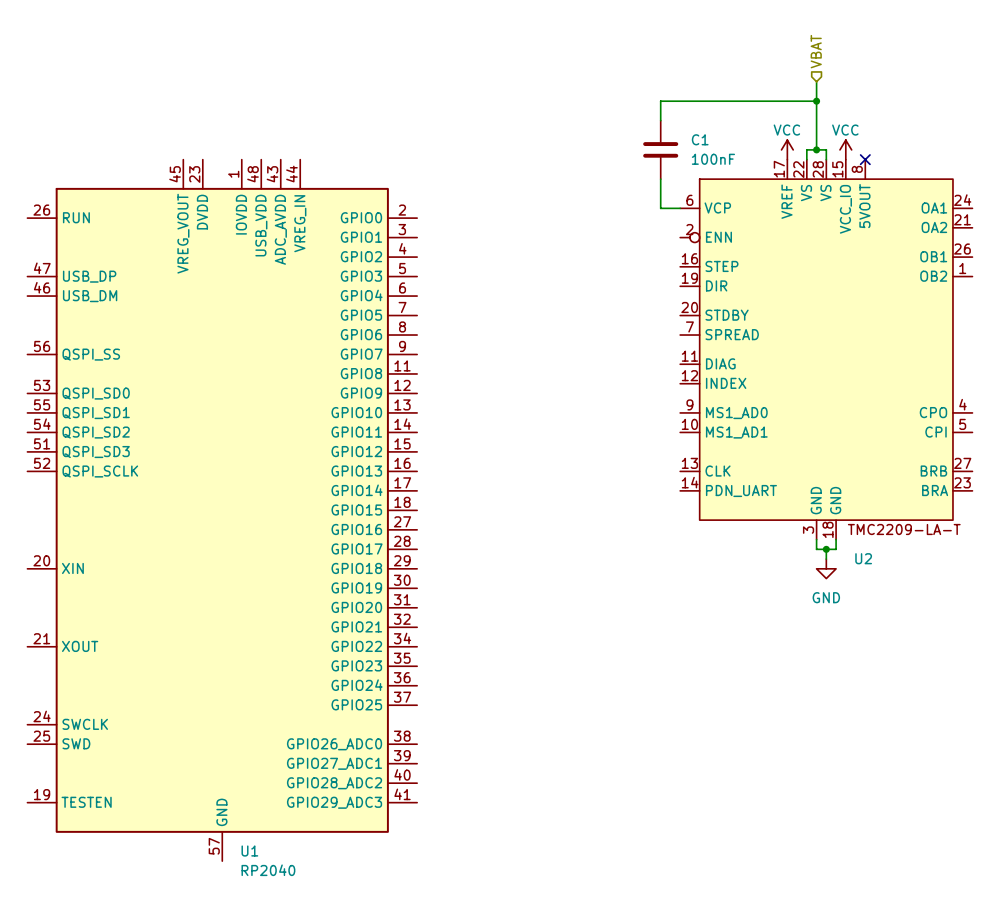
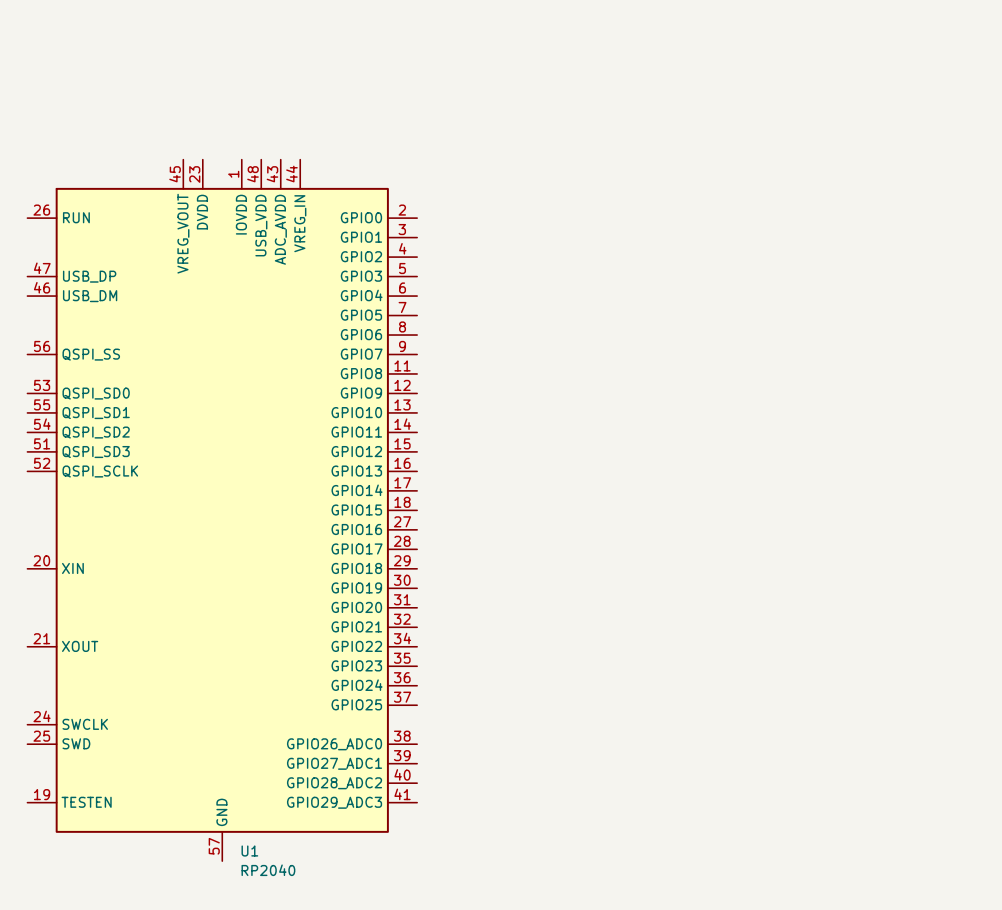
hierarchical label: VBAT (816, 51) -> none
wire: (816, 81) (816, 149) -> none
wire: (816, 101) (660, 101) (660, 120) -> none
junction: (816, 101) -> none
C1: 100nF (660, 149) -> none
power symbol: VCC (787, 149) -> none
junction: (816, 149) -> none
power symbol: VCC (845, 149) -> none
wire: (806, 159) (806, 149) (826, 149) (826, 159) -> none
no-connect mark: (865, 159) -> none
wire: (660, 179) (660, 208) (680, 208) -> none
U2: (826, 349) -> none
wire: (816, 539) (816, 549) (836, 549) (836, 539) -> none
wire: (826, 549) (826, 559) -> none
junction: (826, 549) -> none
power symbol: GND (826, 568) -> none

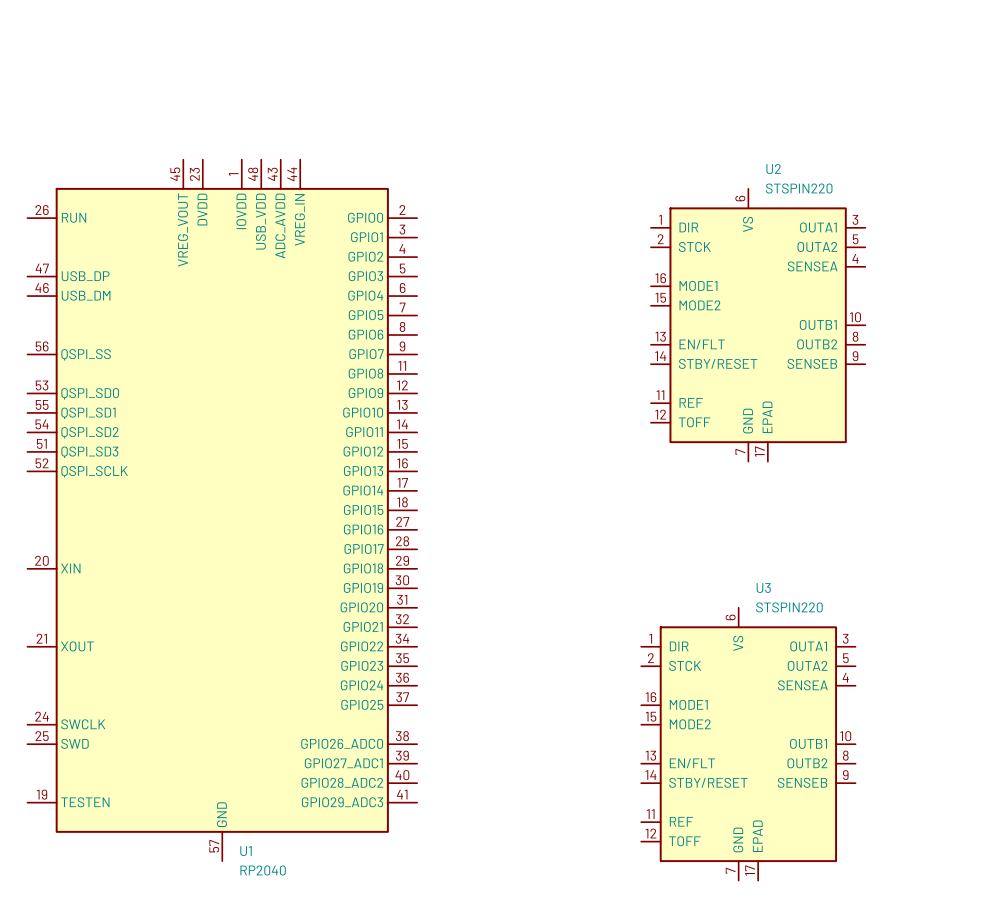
U2: none -> STSPIN220 (758, 325)
U3: none -> STSPIN220 (748, 744)

